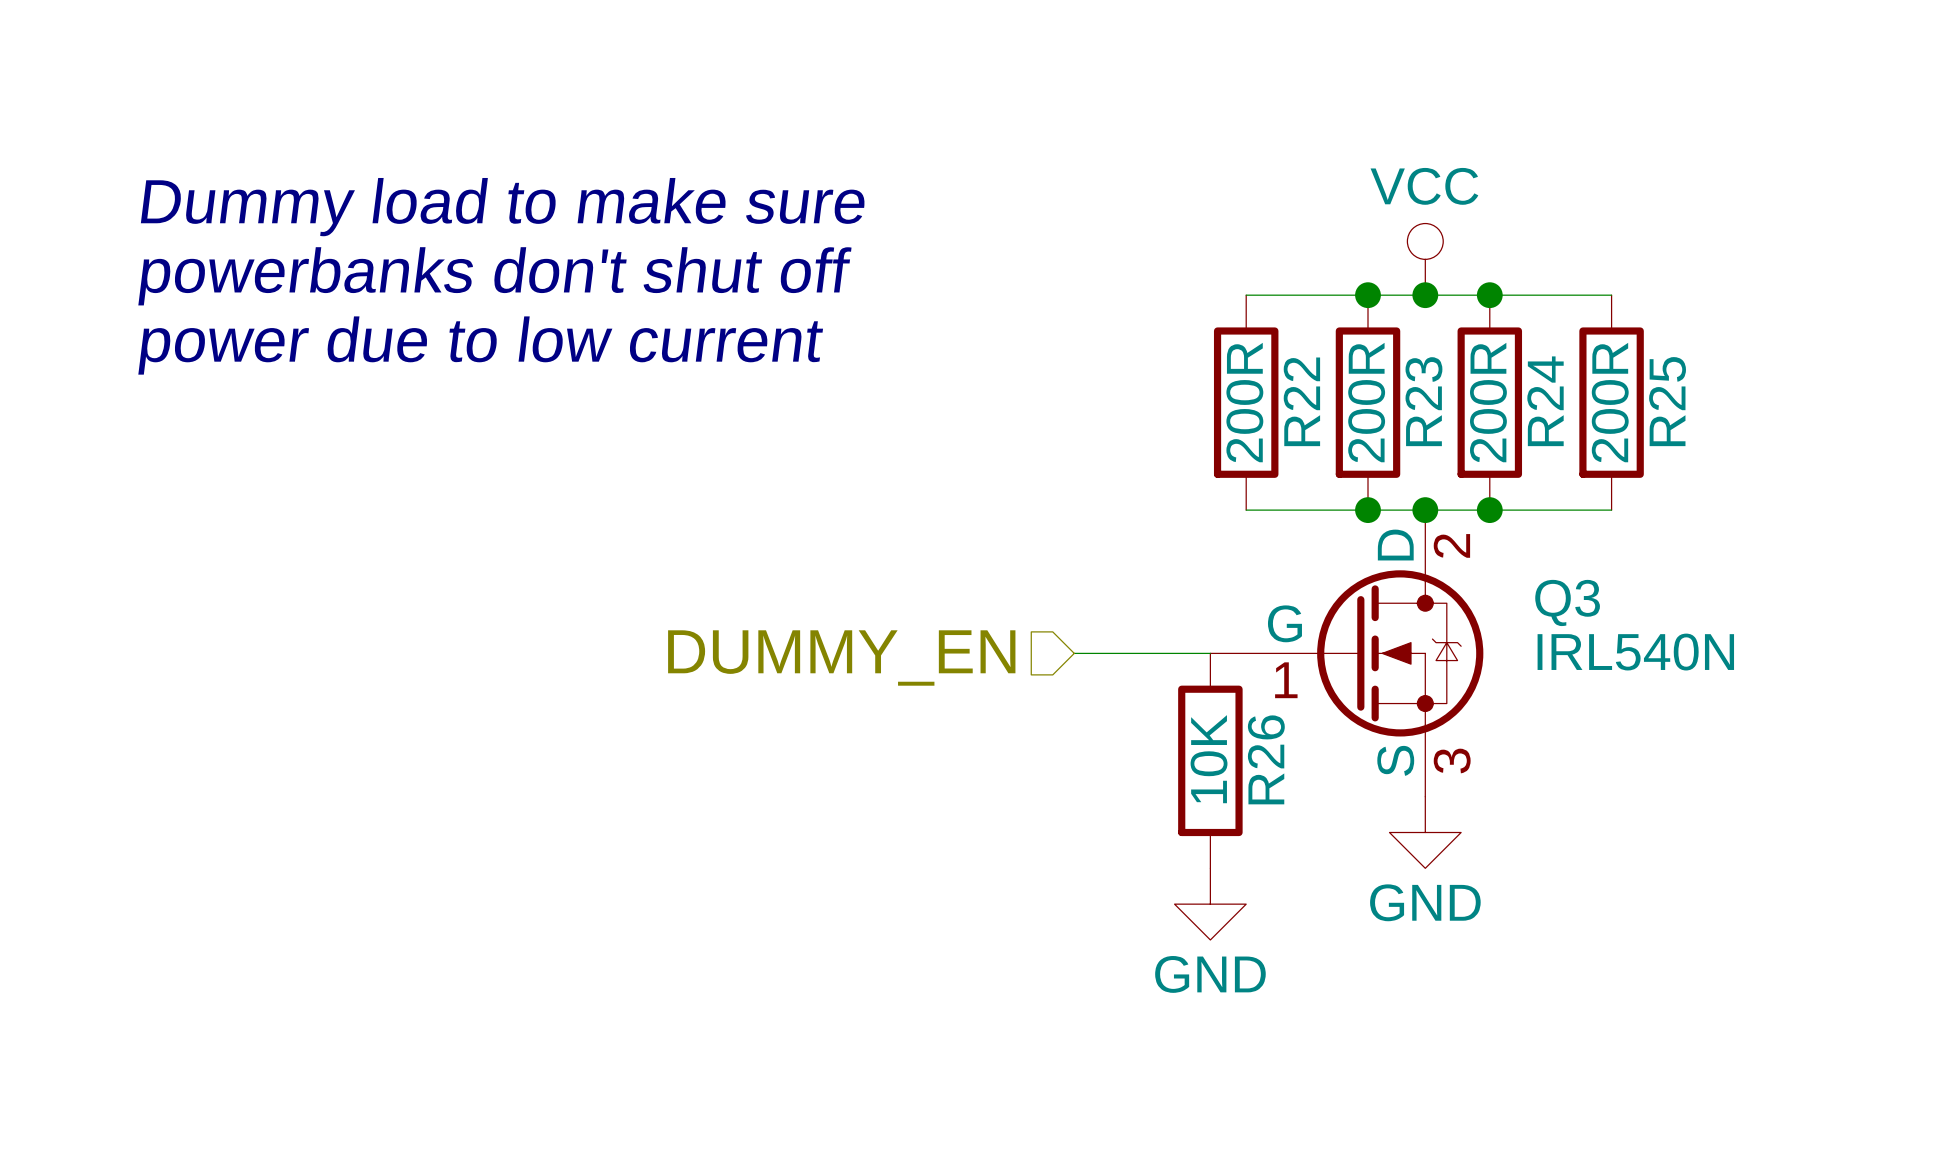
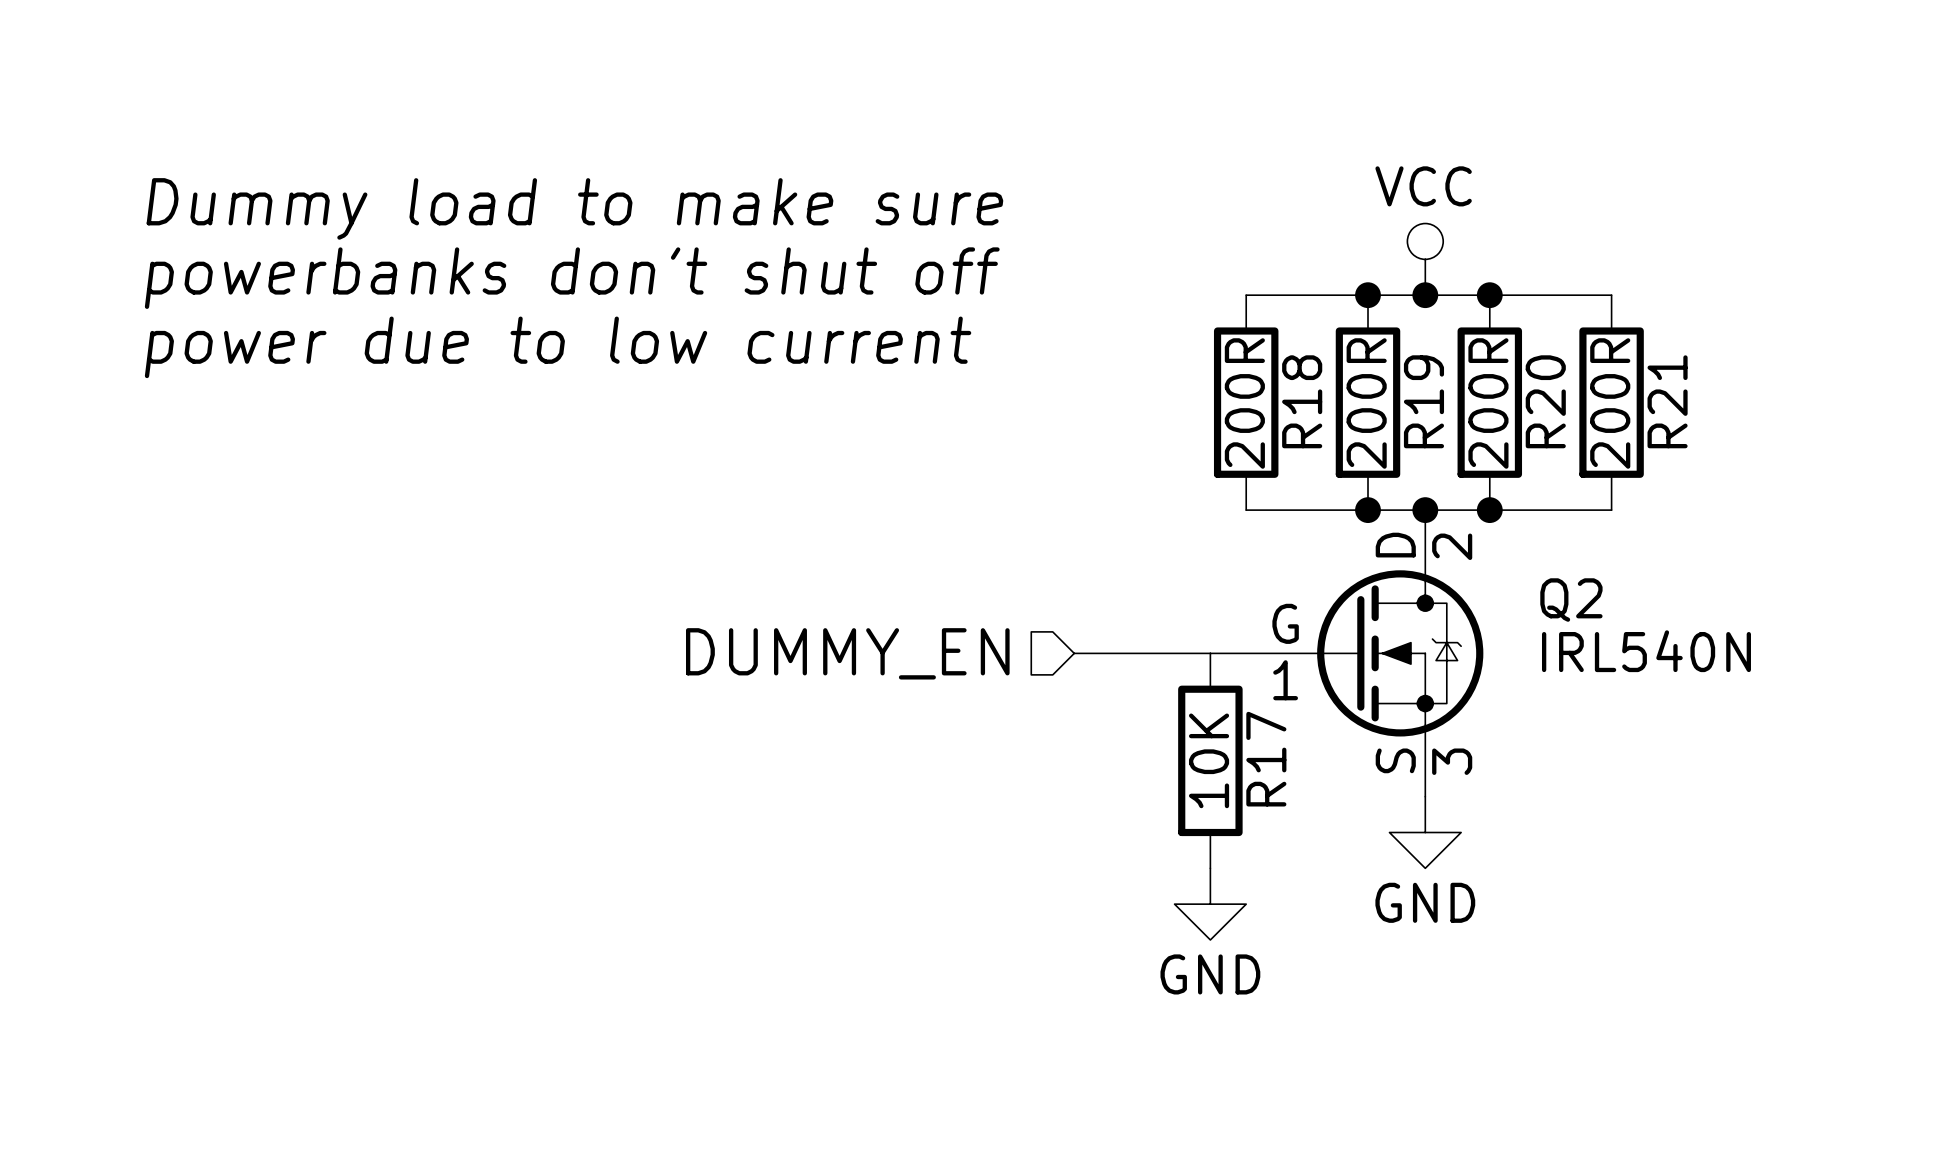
R22 name: R22 (1301, 401) -> R18 (1302, 401)
R23 name: R23 (1423, 401) -> R19 (1423, 401)
R24 name: R24 (1545, 401) -> R20 (1545, 401)
R25 name: R25 (1667, 401) -> R21 (1667, 401)
Q3 name: Q3 (1567, 602) -> Q2 (1571, 600)
R26 name: R26 (1266, 759) -> R17 (1266, 759)

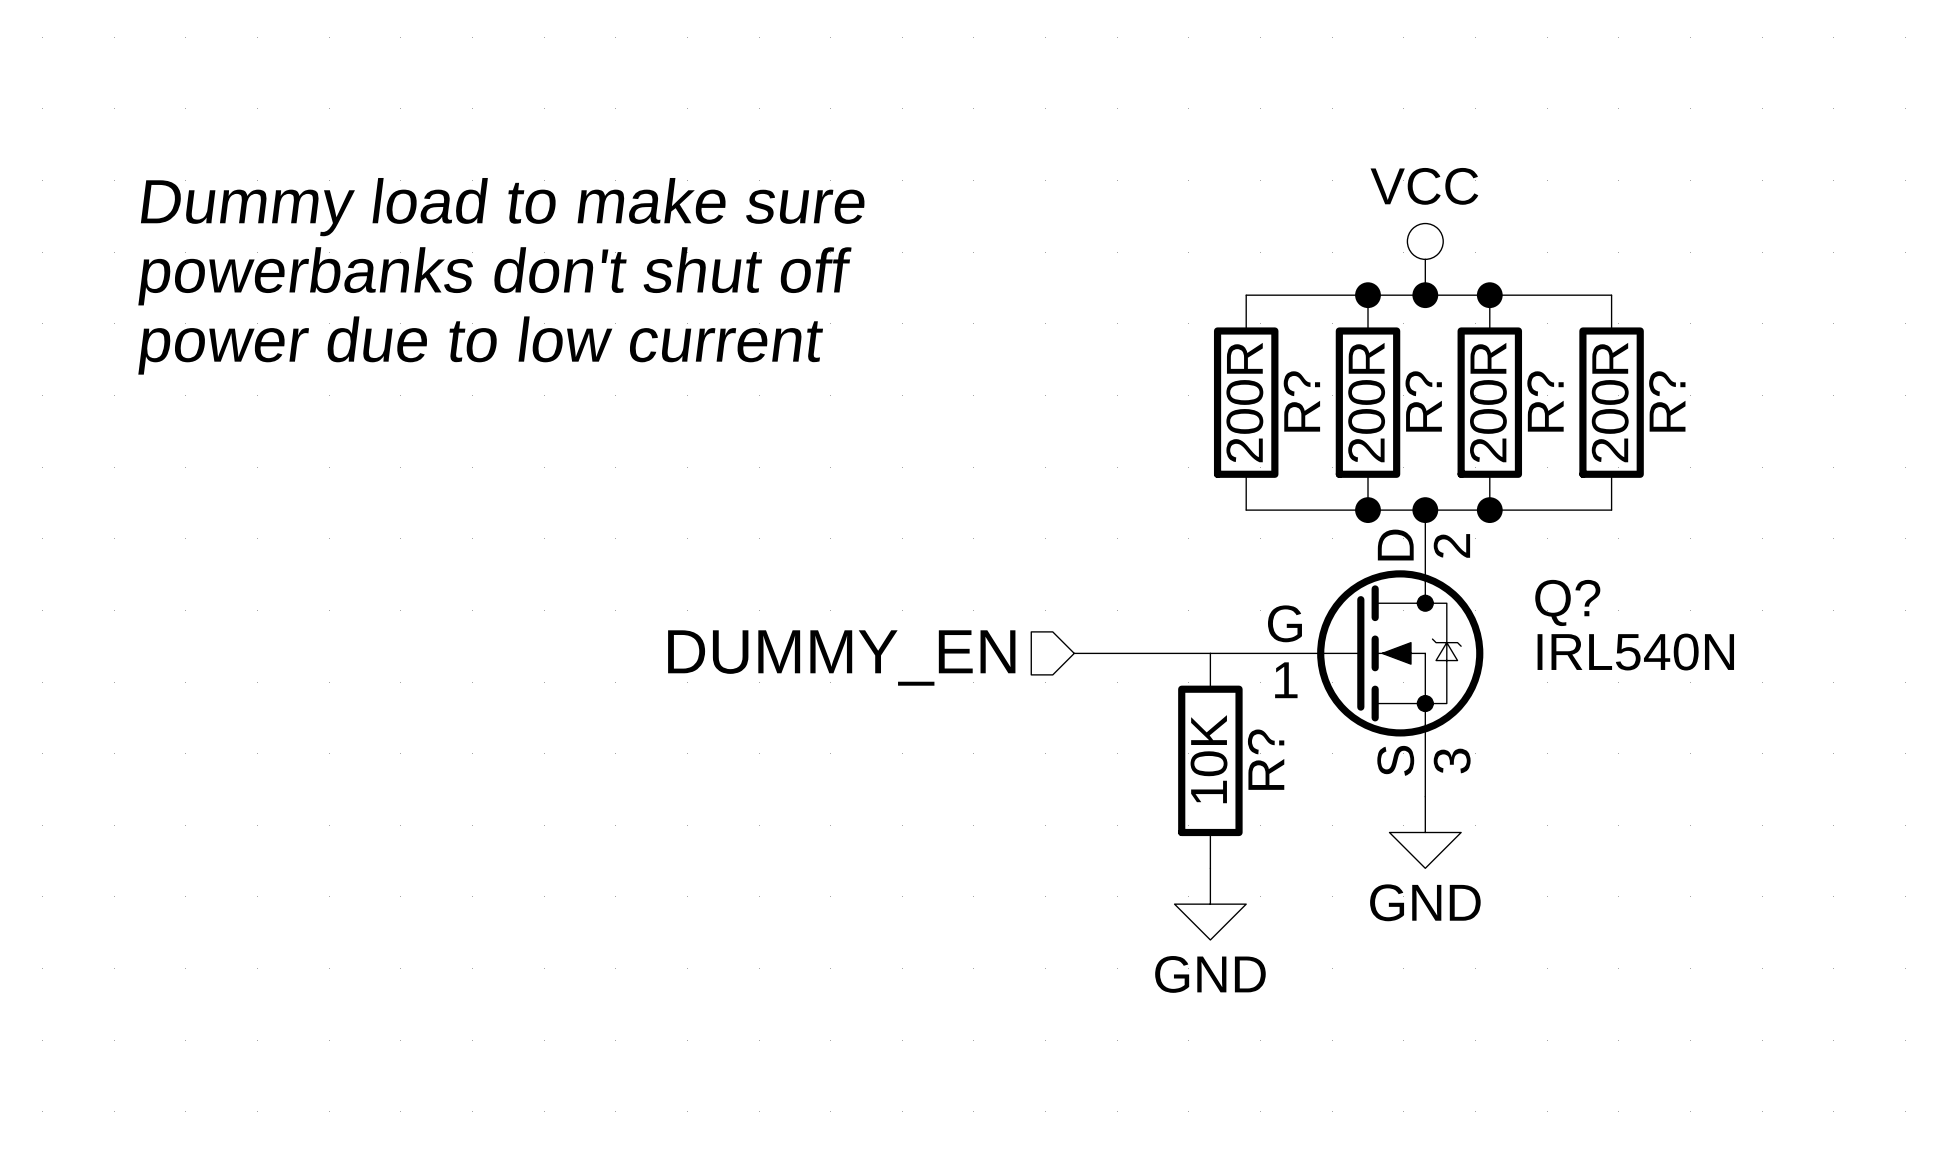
R18 name: R18 (1302, 401) -> R? (1301, 401)
R19 name: R19 (1423, 401) -> R? (1423, 401)
R20 name: R20 (1545, 401) -> R? (1545, 401)
R21 name: R21 (1667, 401) -> R? (1667, 401)
Q2 name: Q2 (1571, 600) -> Q? (1567, 602)
R17 name: R17 (1266, 759) -> R? (1266, 759)

